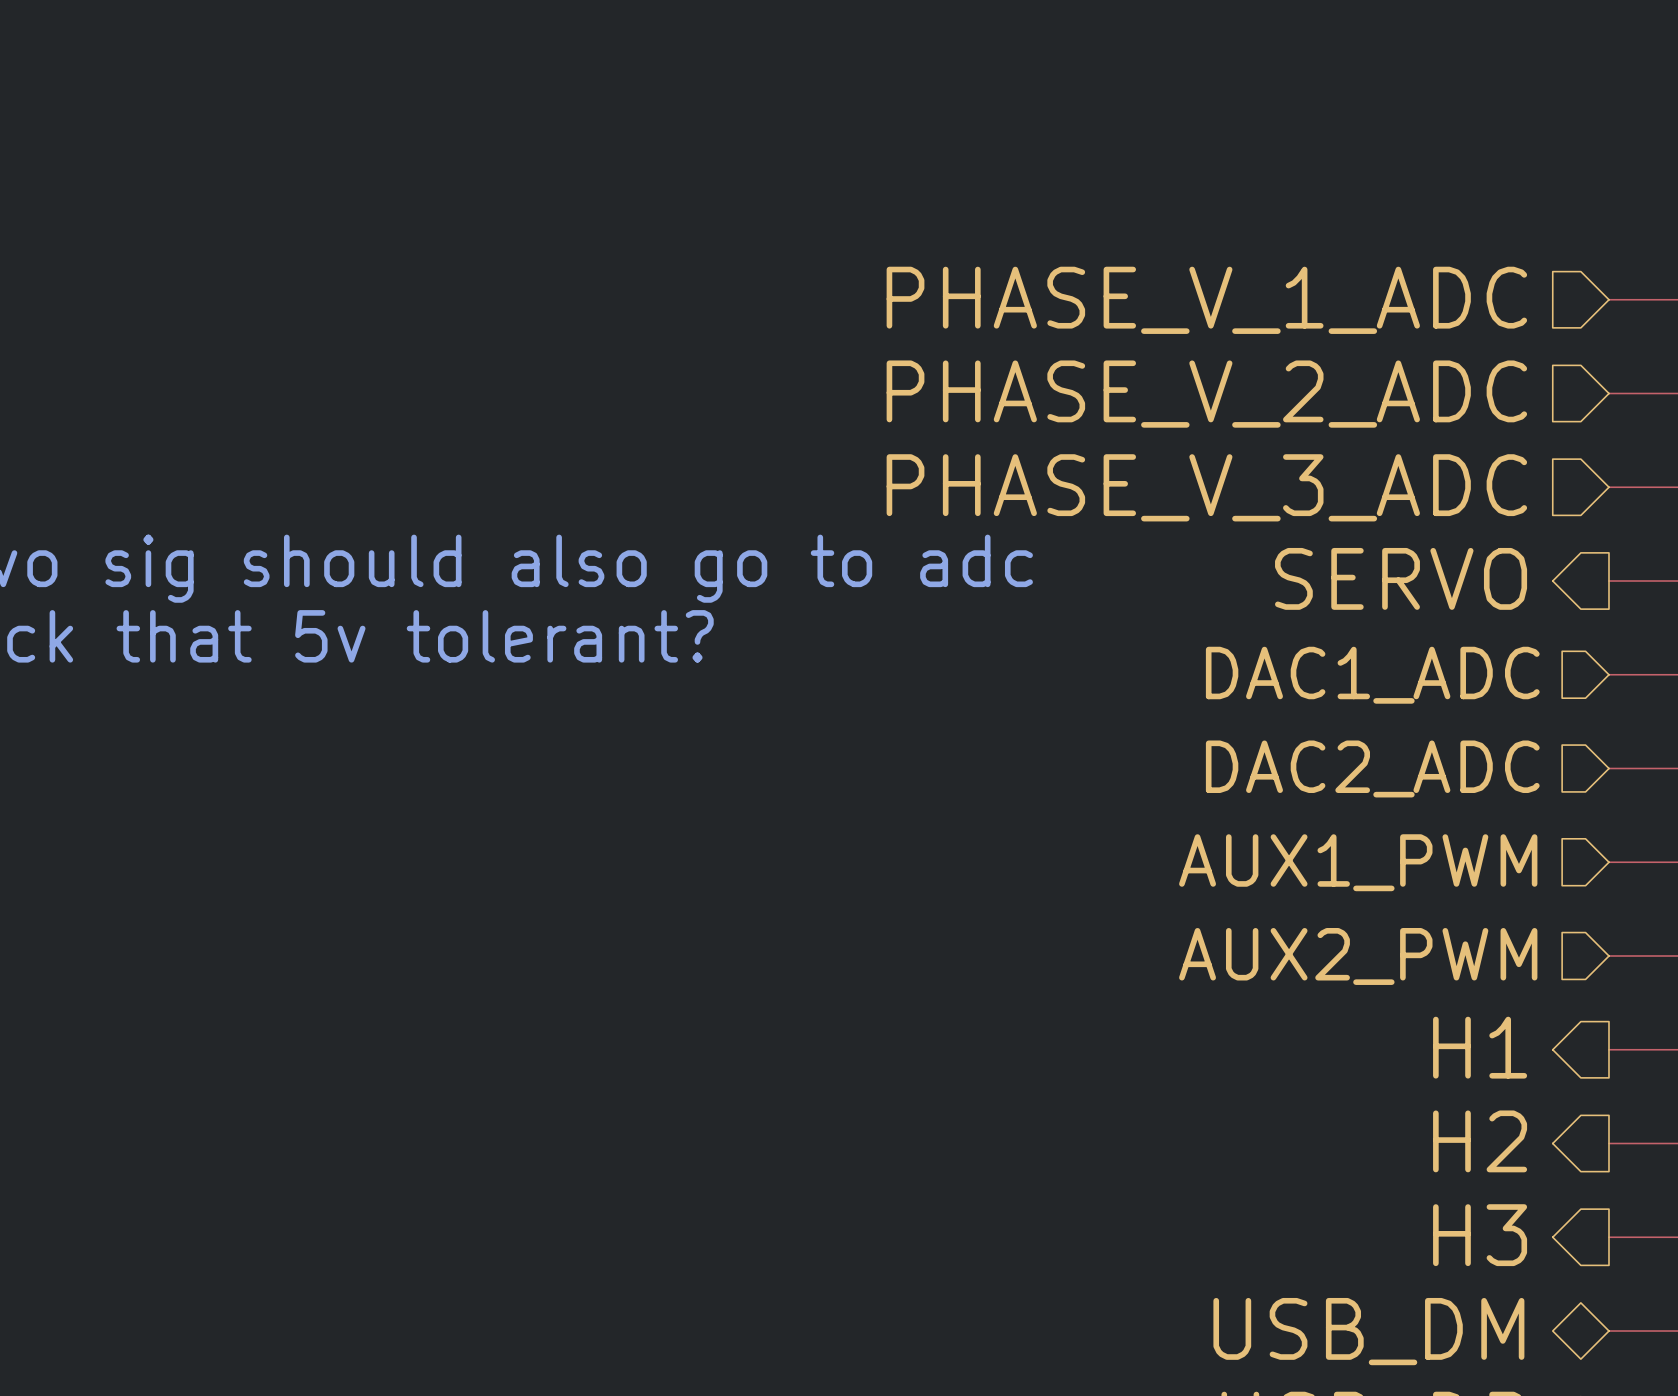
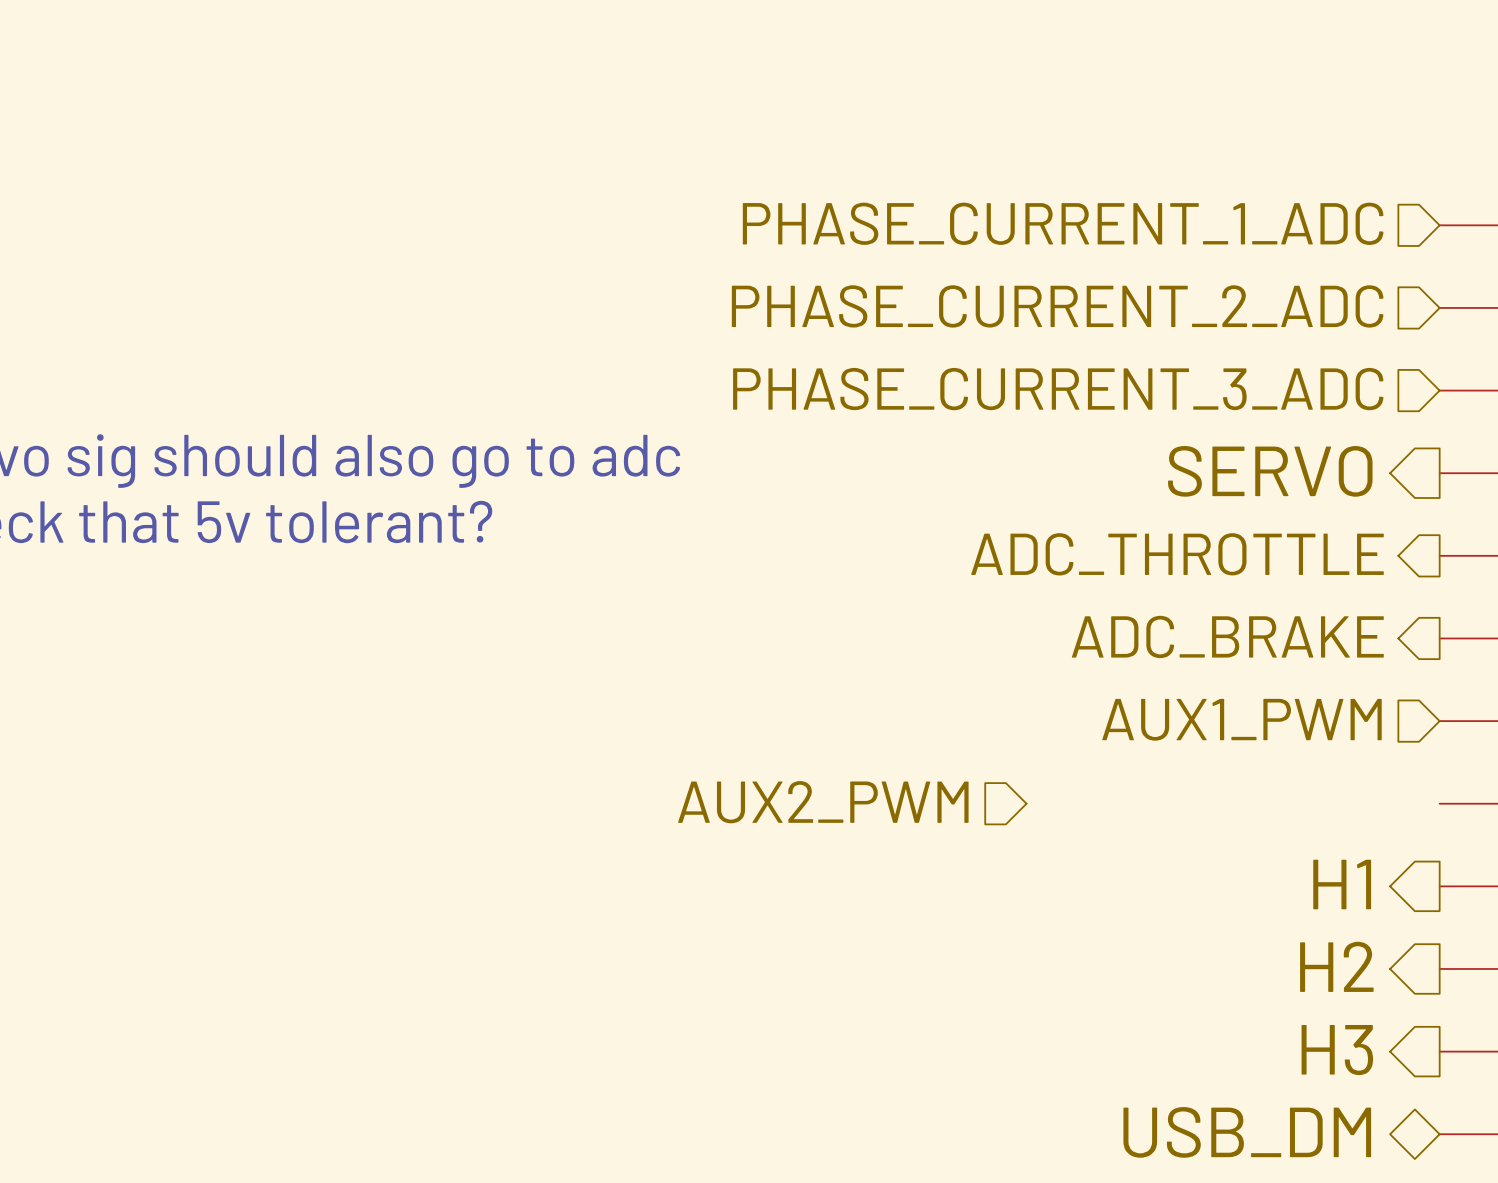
hierarchical label: PHASE_V_1_ADC (1206, 300) -> PHASE_CURRENT_1_ADC (1063, 223)
hierarchical label: PHASE_V_2_ADC (1206, 394) -> PHASE_CURRENT_2_ADC (1057, 306)
hierarchical label: PHASE_V_3_ADC (1206, 487) -> PHASE_CURRENT_3_ADC (1058, 389)
hierarchical label shape: input (1372, 675) -> output (1177, 554)
hierarchical label: DAC1_ADC (1372, 675) -> ADC_THROTTLE (1177, 554)
hierarchical label shape: input (1372, 768) -> output (1227, 636)
hierarchical label: DAC2_ADC (1372, 768) -> ADC_BRAKE (1227, 636)
hierarchical label position: AUX2_PWM (1358, 956) -> AUX2_PWM (823, 802)

